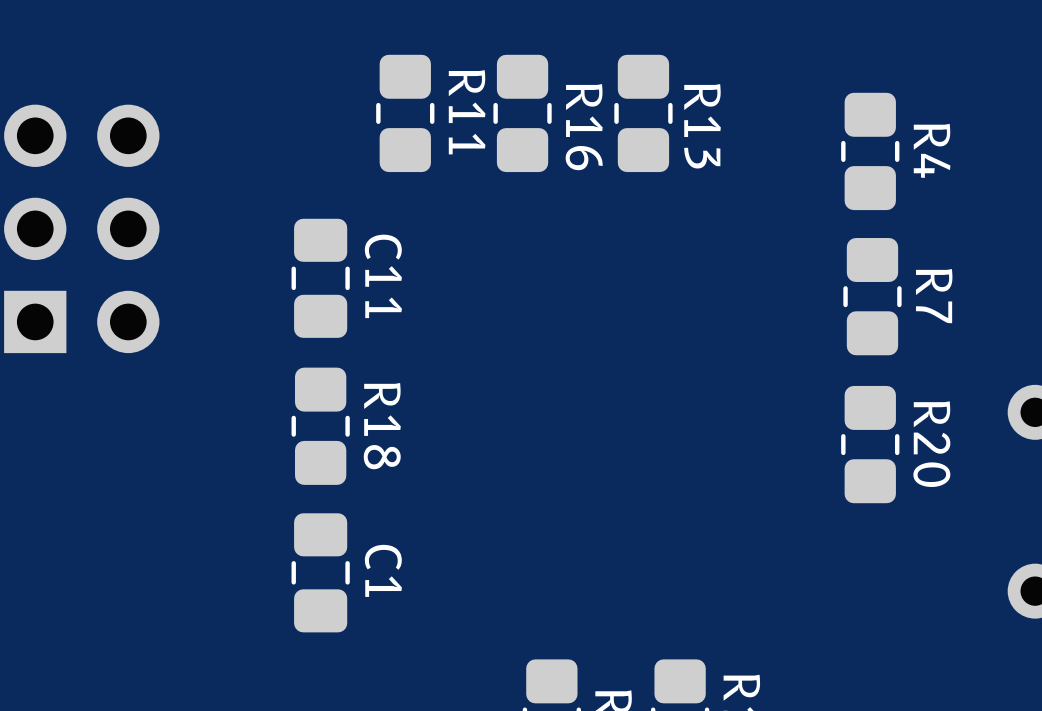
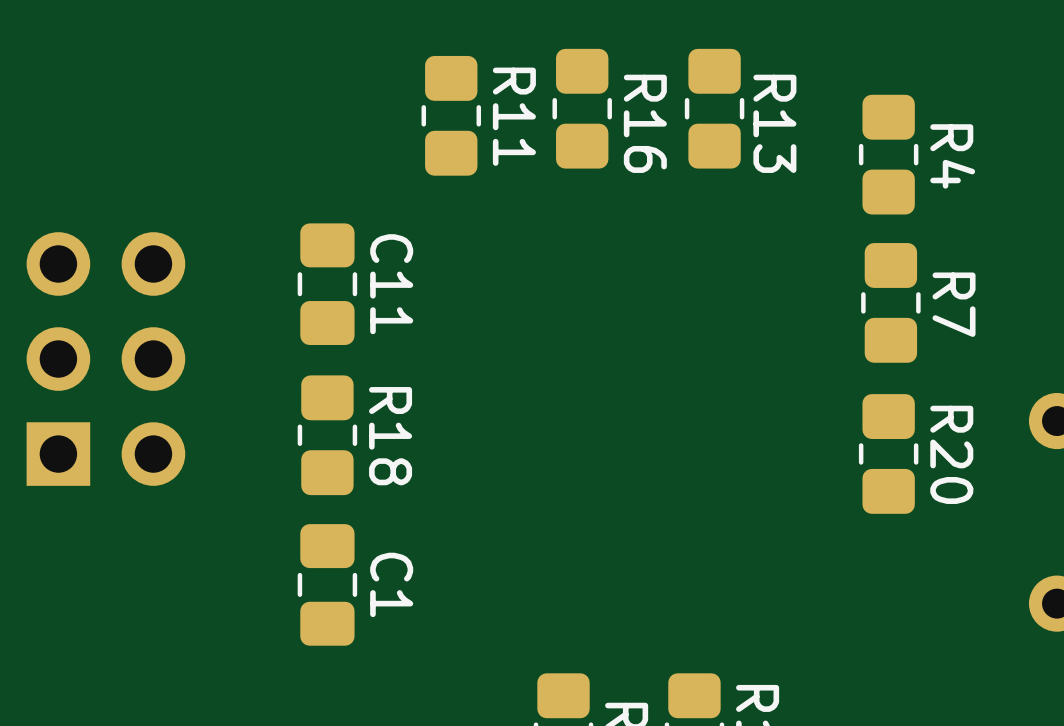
R11 position: (405, 113) -> (451, 115)
R16 position: (522, 113) -> (582, 108)
R13 position: (643, 113) -> (714, 108)
part position: (81, 228) -> (105, 359)

